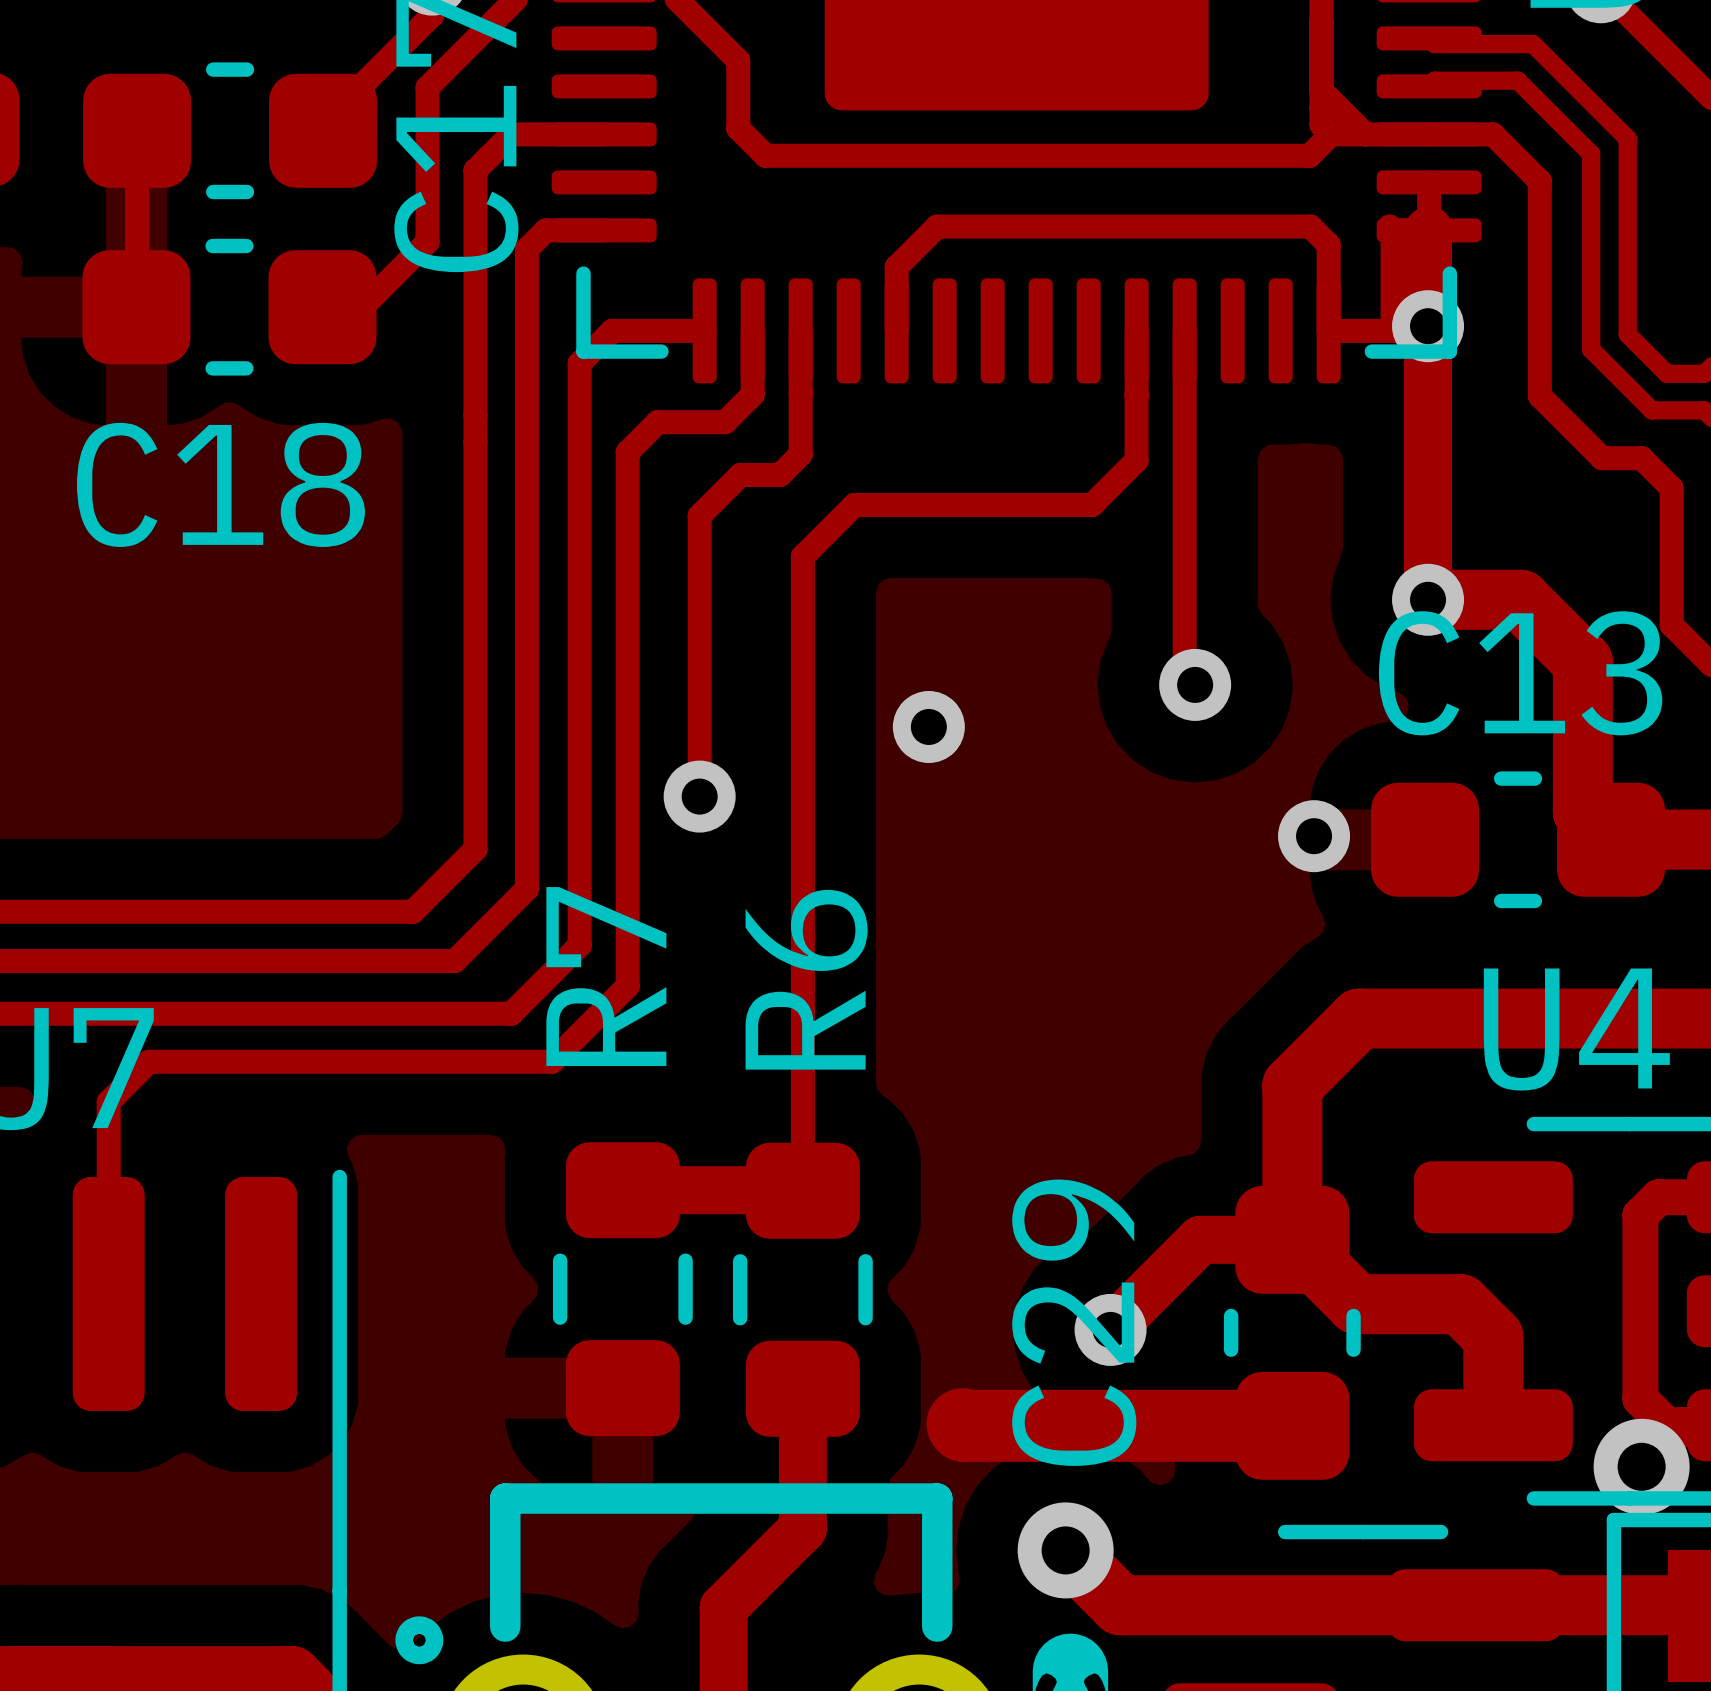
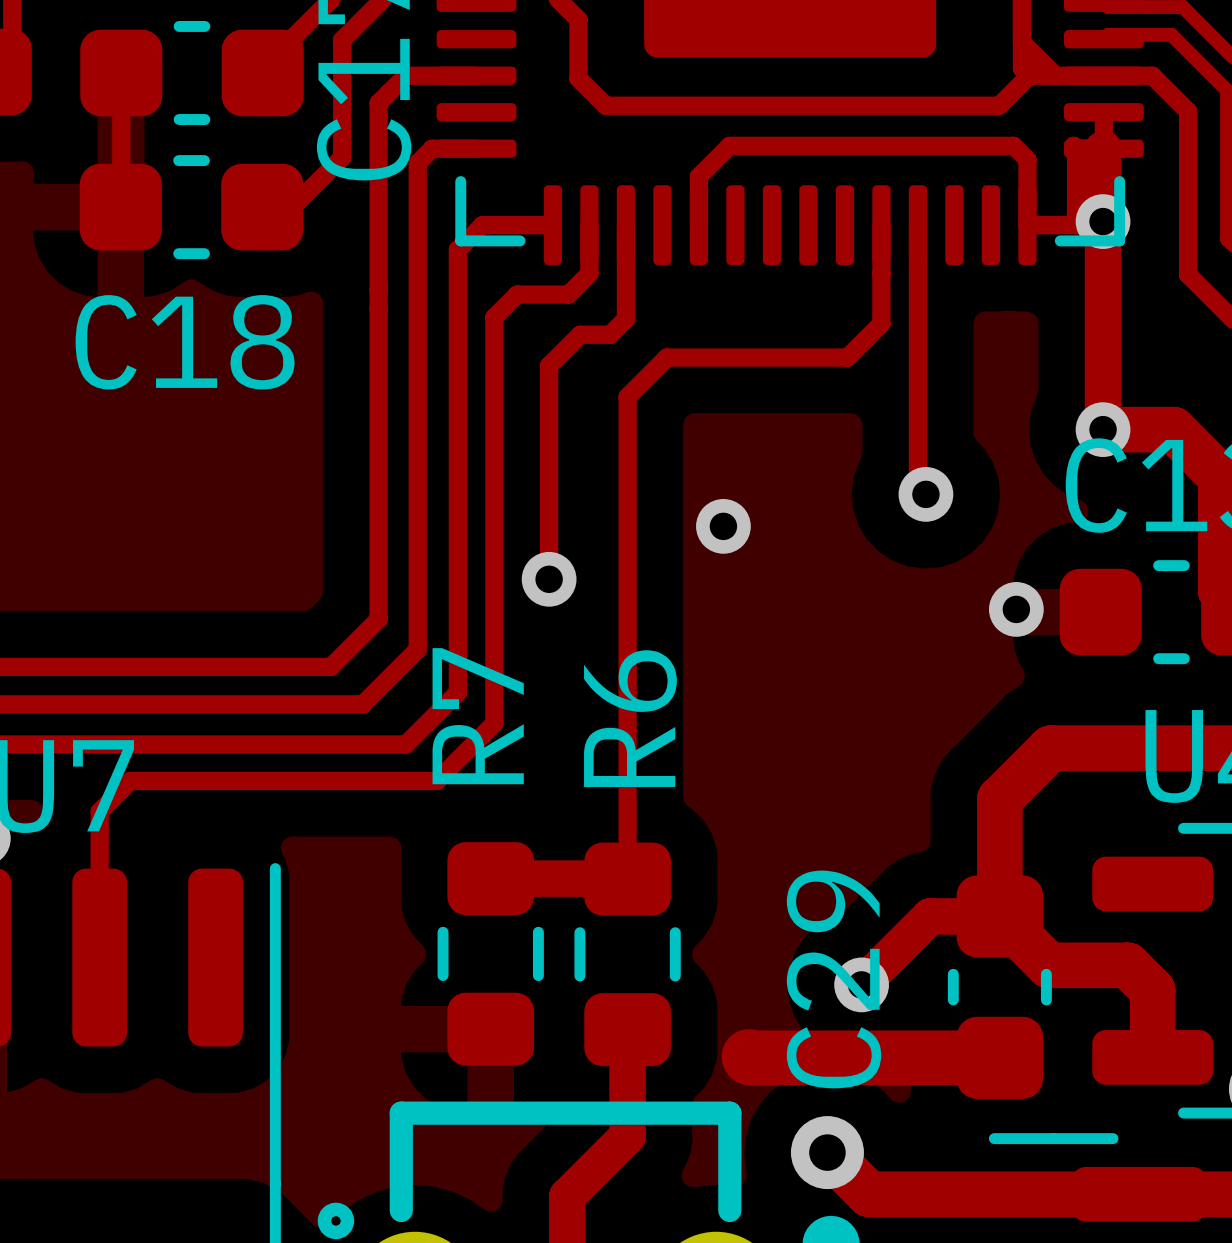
track: (738, 128) (765, 155) (1309, 155) -> (578, 71) (578, 78) (605, 105) (999, 105) (1013, 91)

